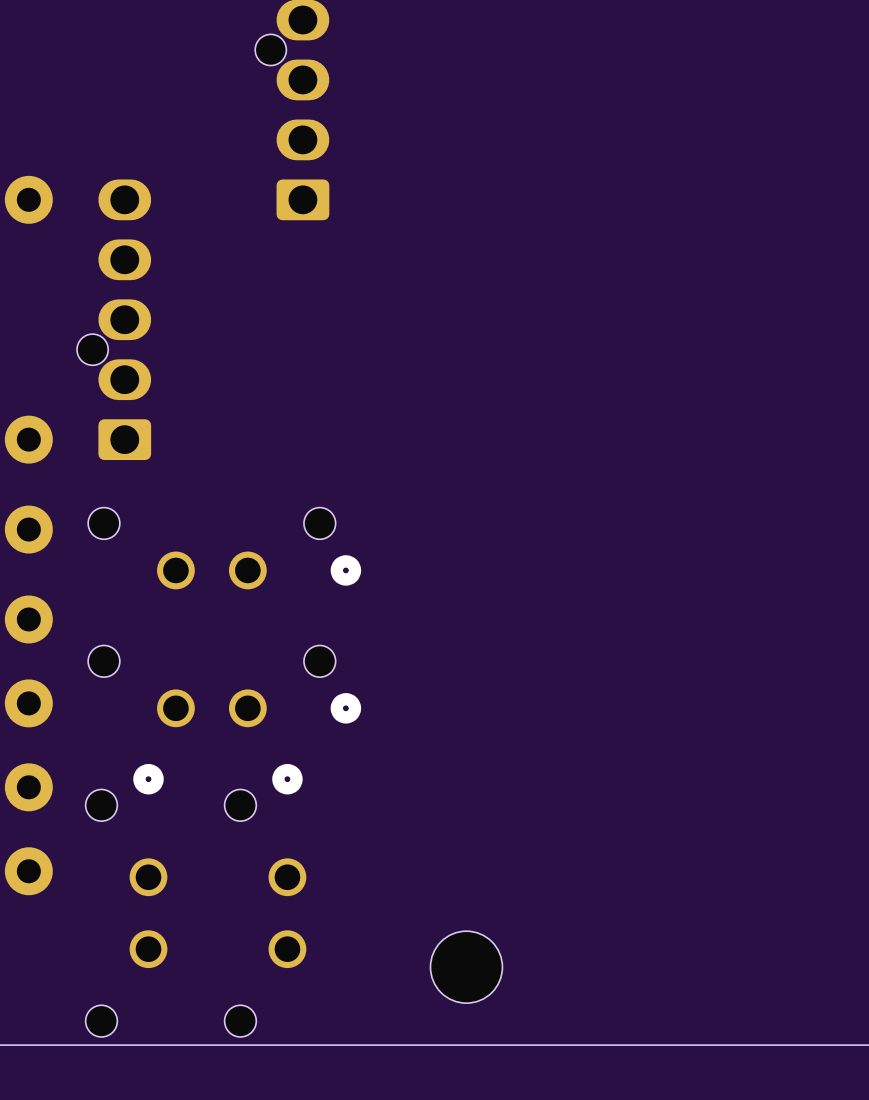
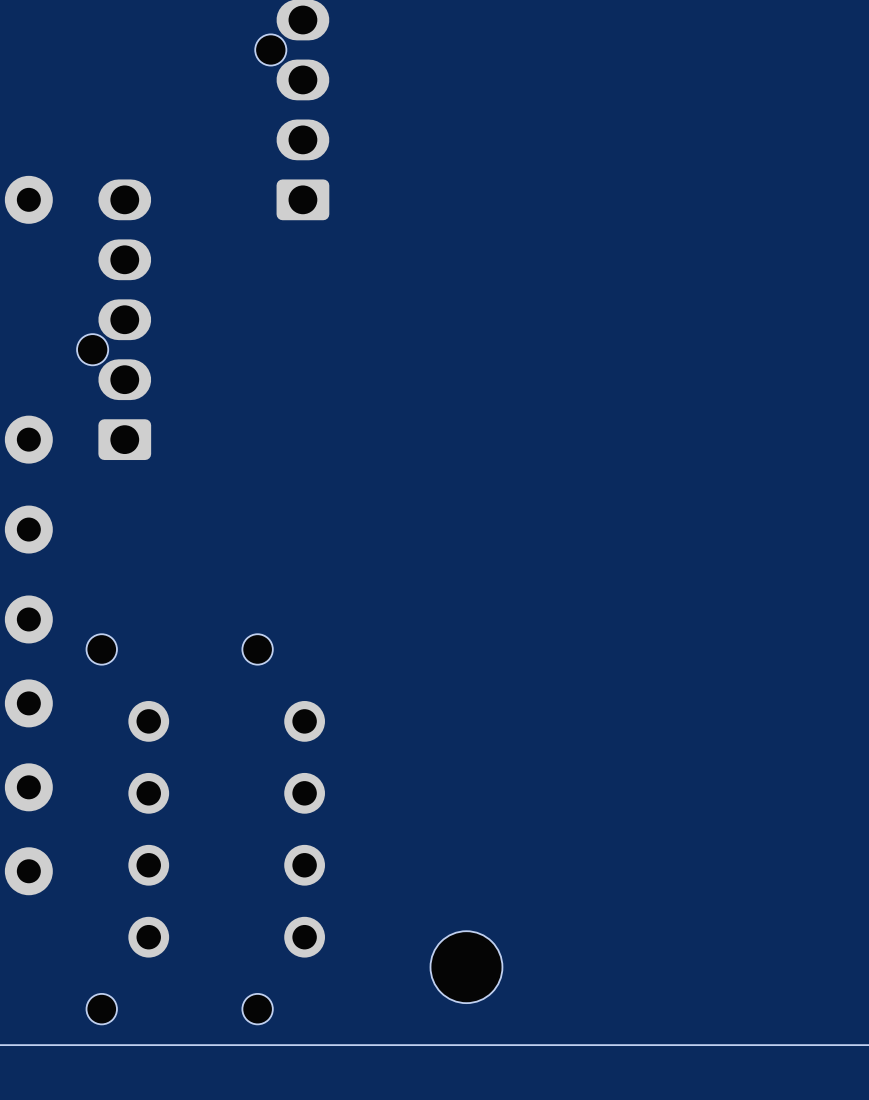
part: (224, 548) -> none
part: (224, 686) -> none
part: none -> (127, 829)
part: none -> (283, 829)
part: (126, 900) -> none
part: (265, 900) -> none

